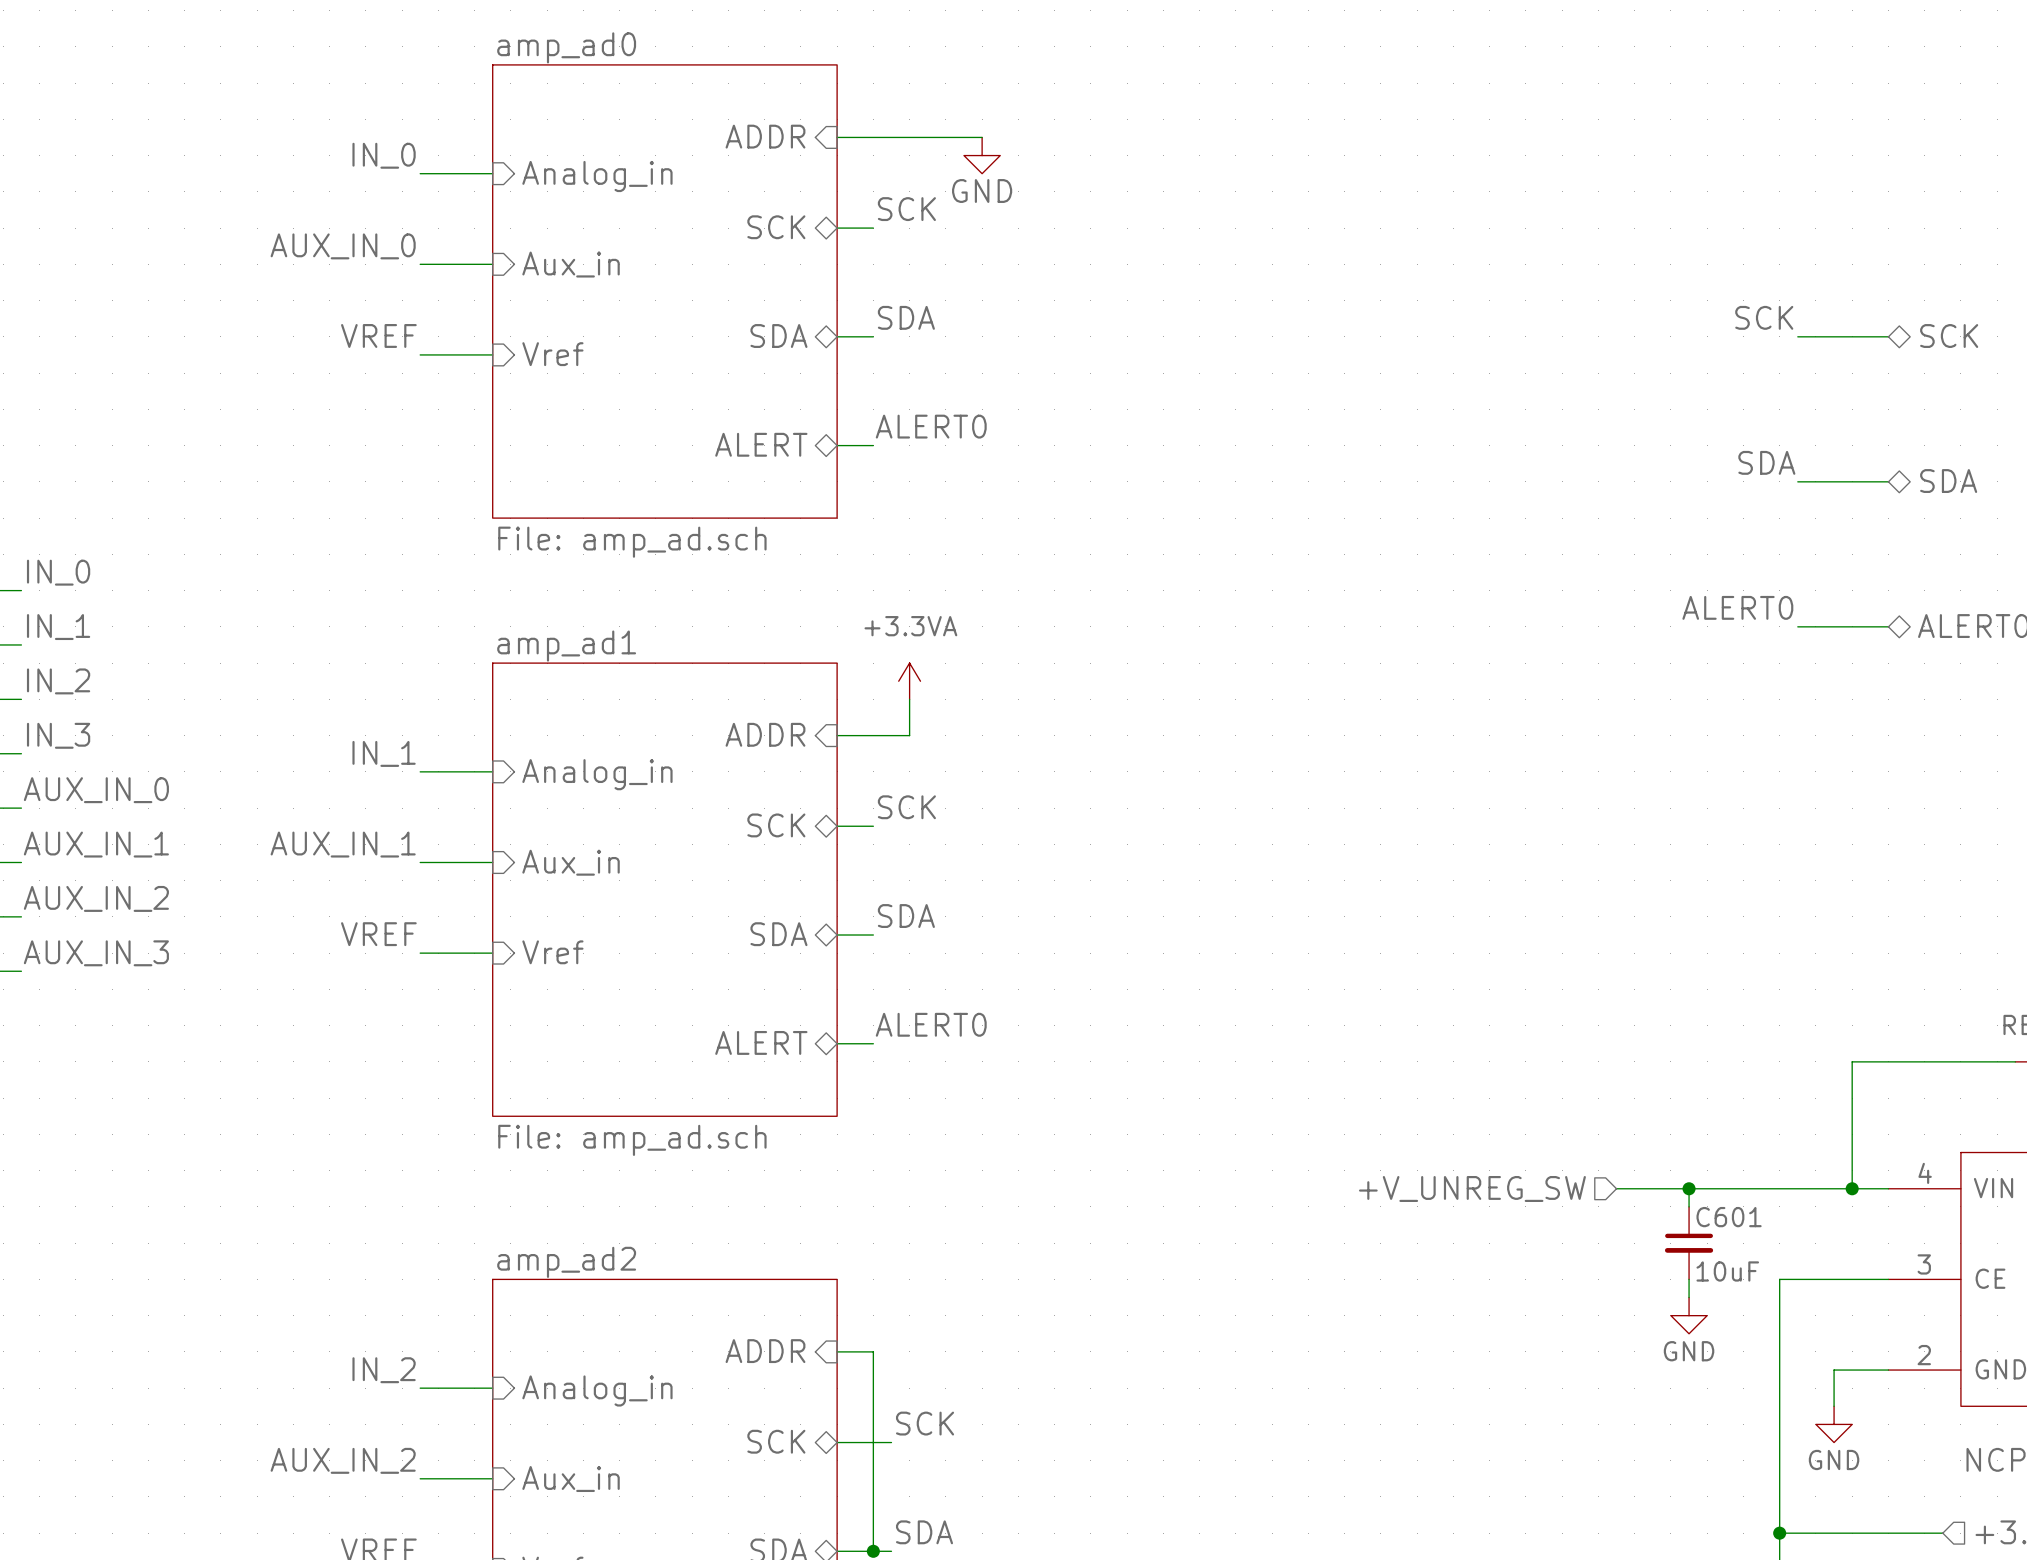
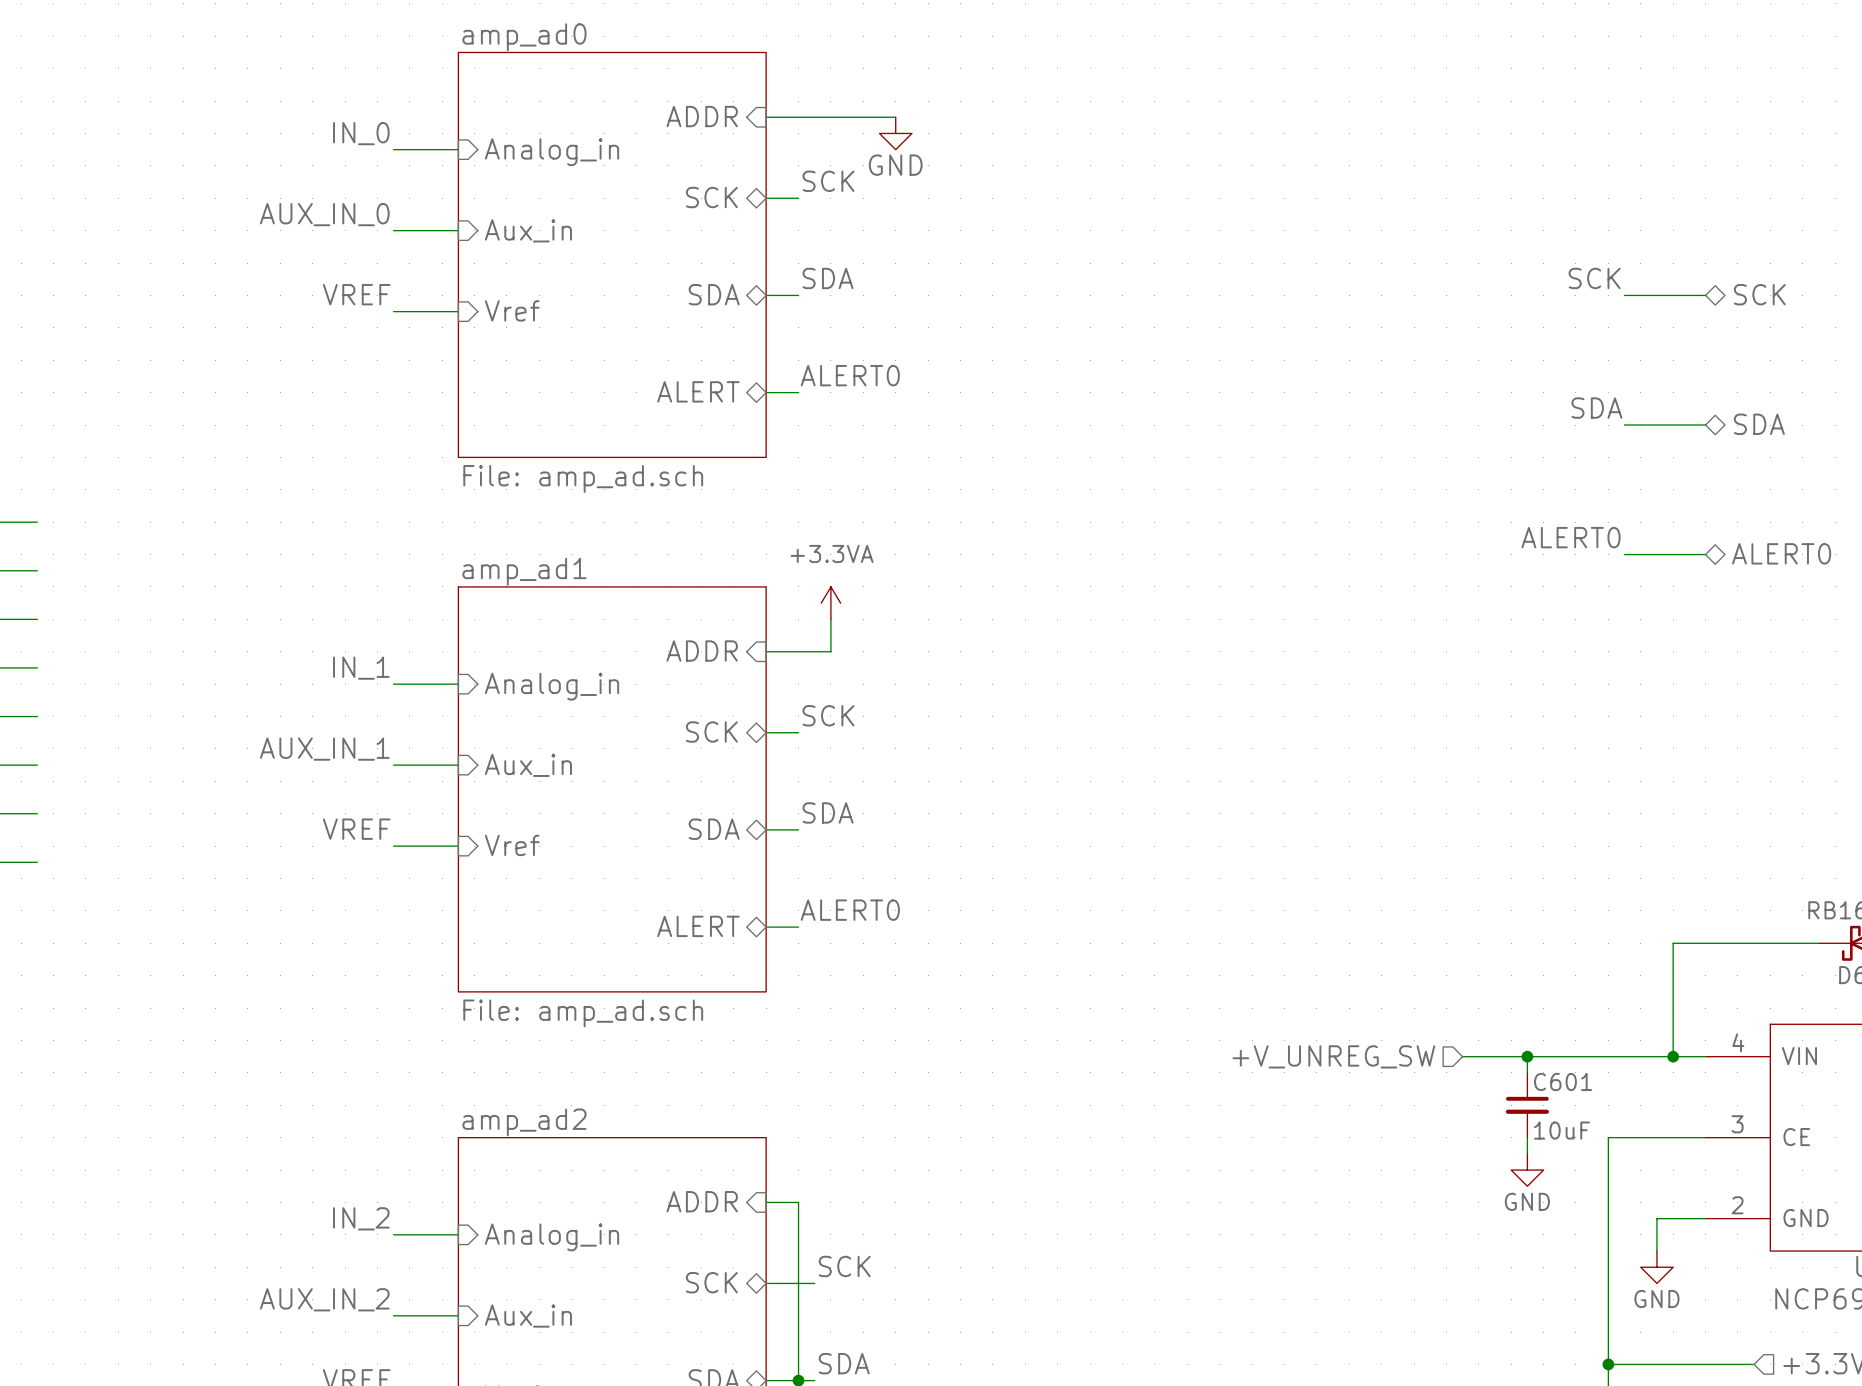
label: IN_0 (58, 572) -> none
label: IN_1 (58, 627) -> none
label: IN_2 (58, 681) -> none
label: IN_3 (58, 735) -> none
label: AUX_IN_0 (96, 790) -> none
label: AUX_IN_1 (96, 844) -> none
label: AUX_IN_2 (96, 898) -> none
label: AUX_IN_3 (96, 953) -> none

